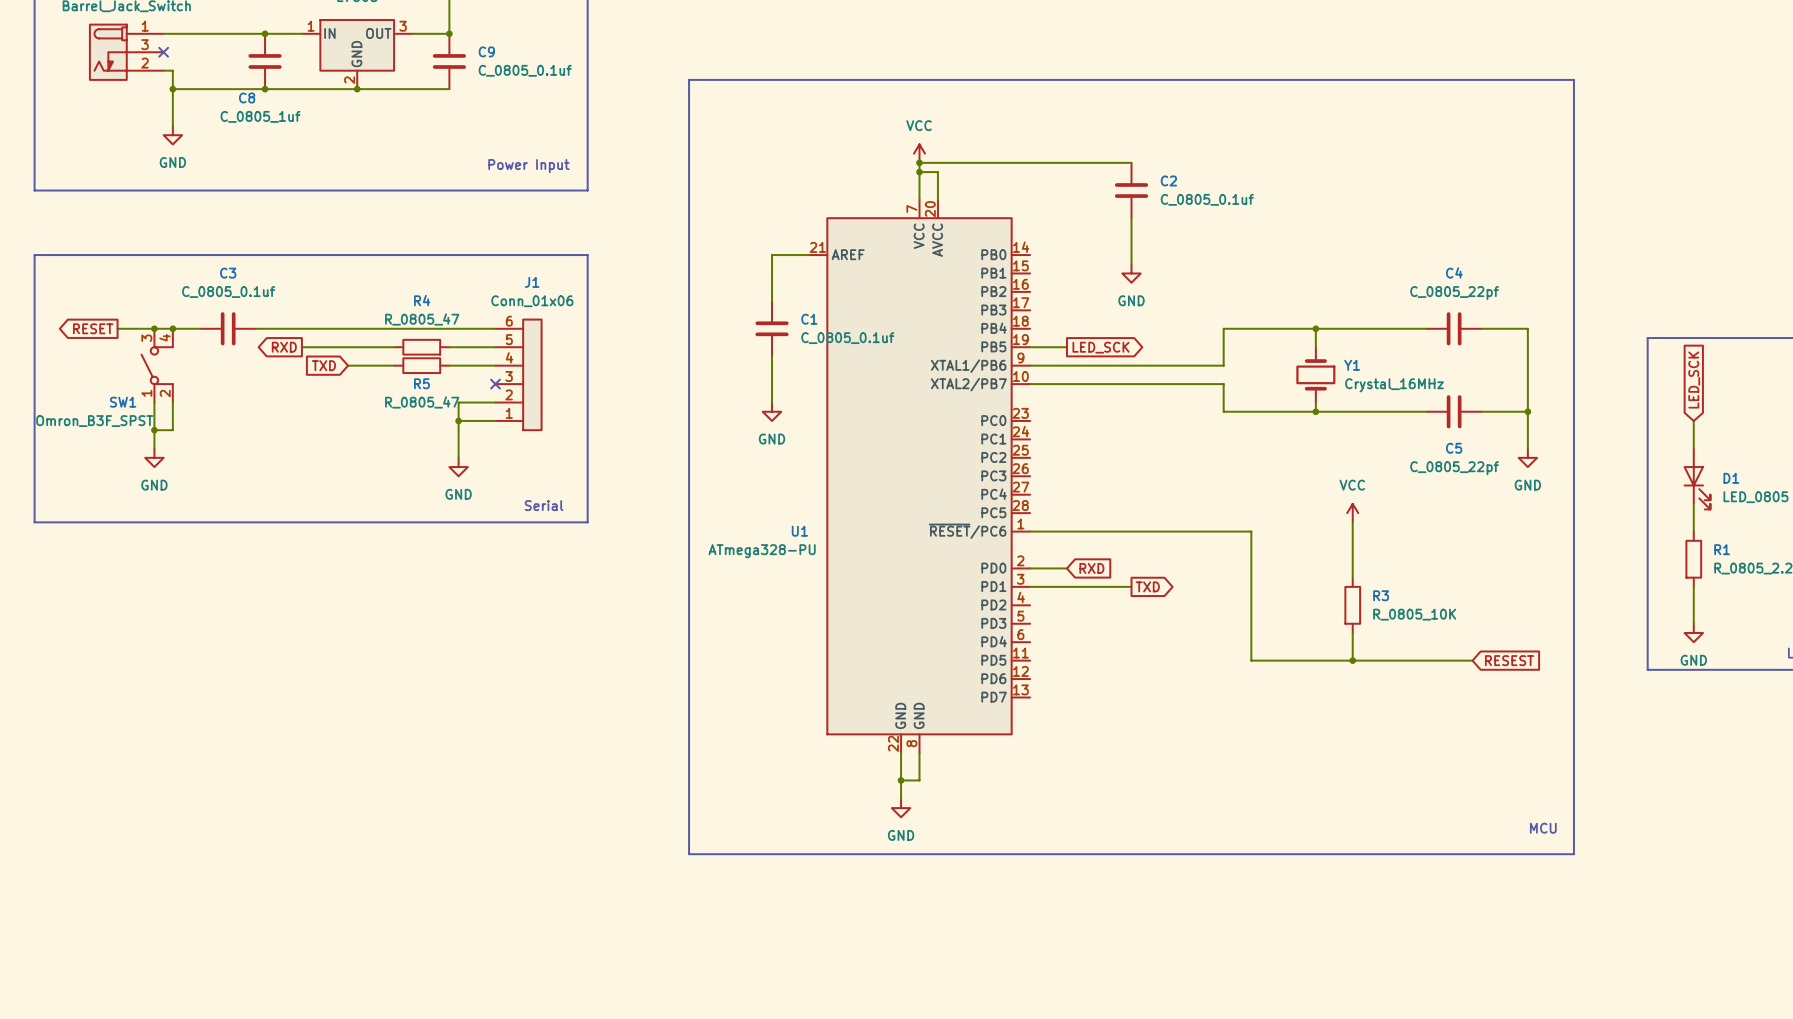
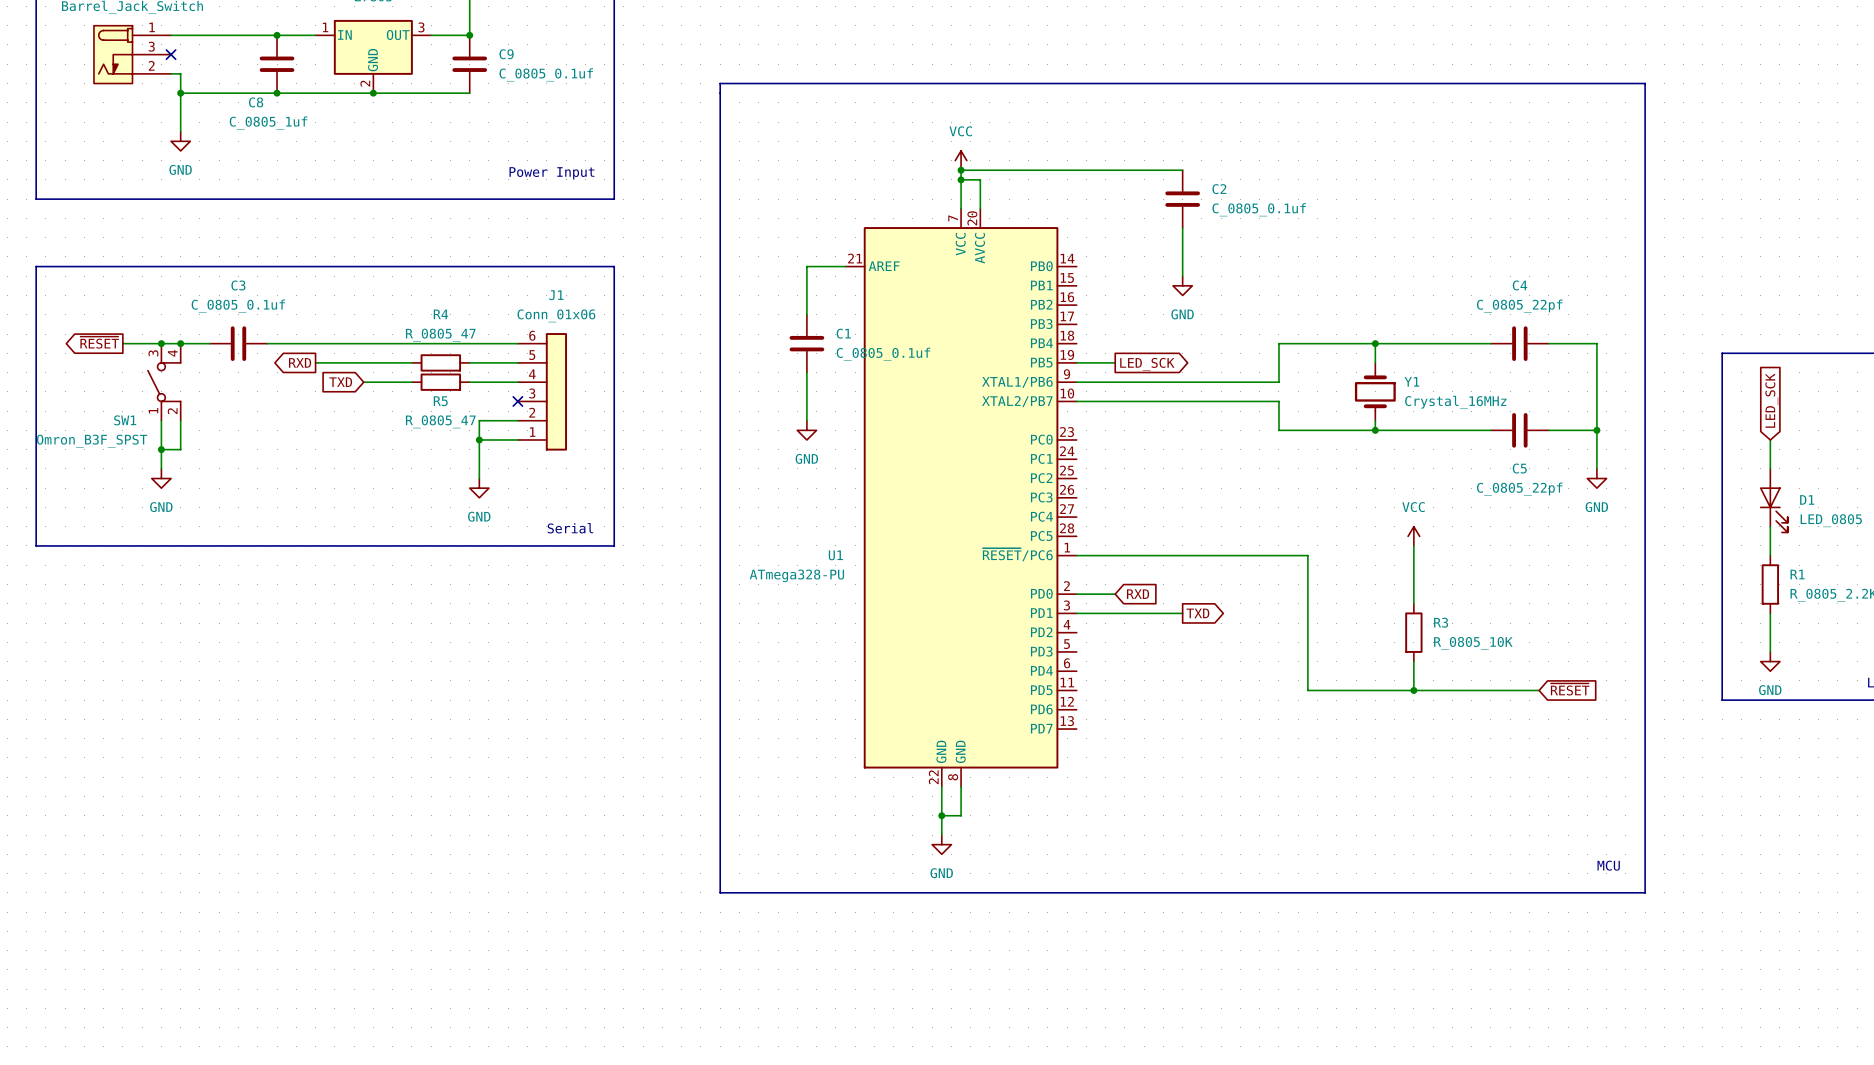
global label: RESET (93, 328) -> ~{RESET} (99, 342)
global label: RESEST (1509, 660) -> ~{RESET} (1570, 689)

